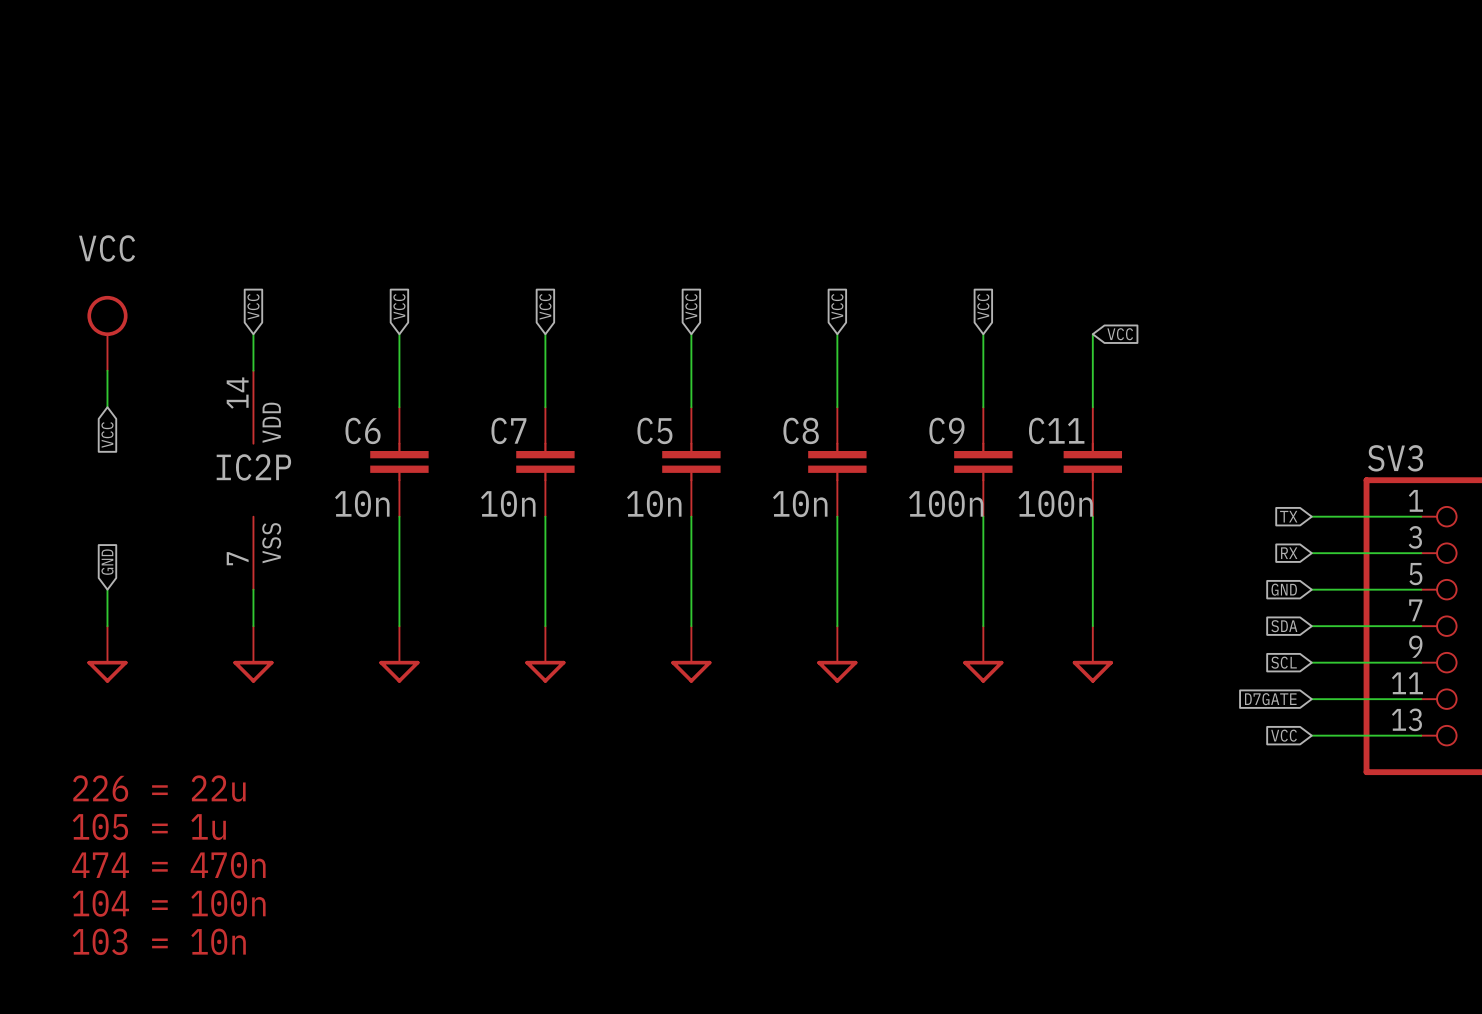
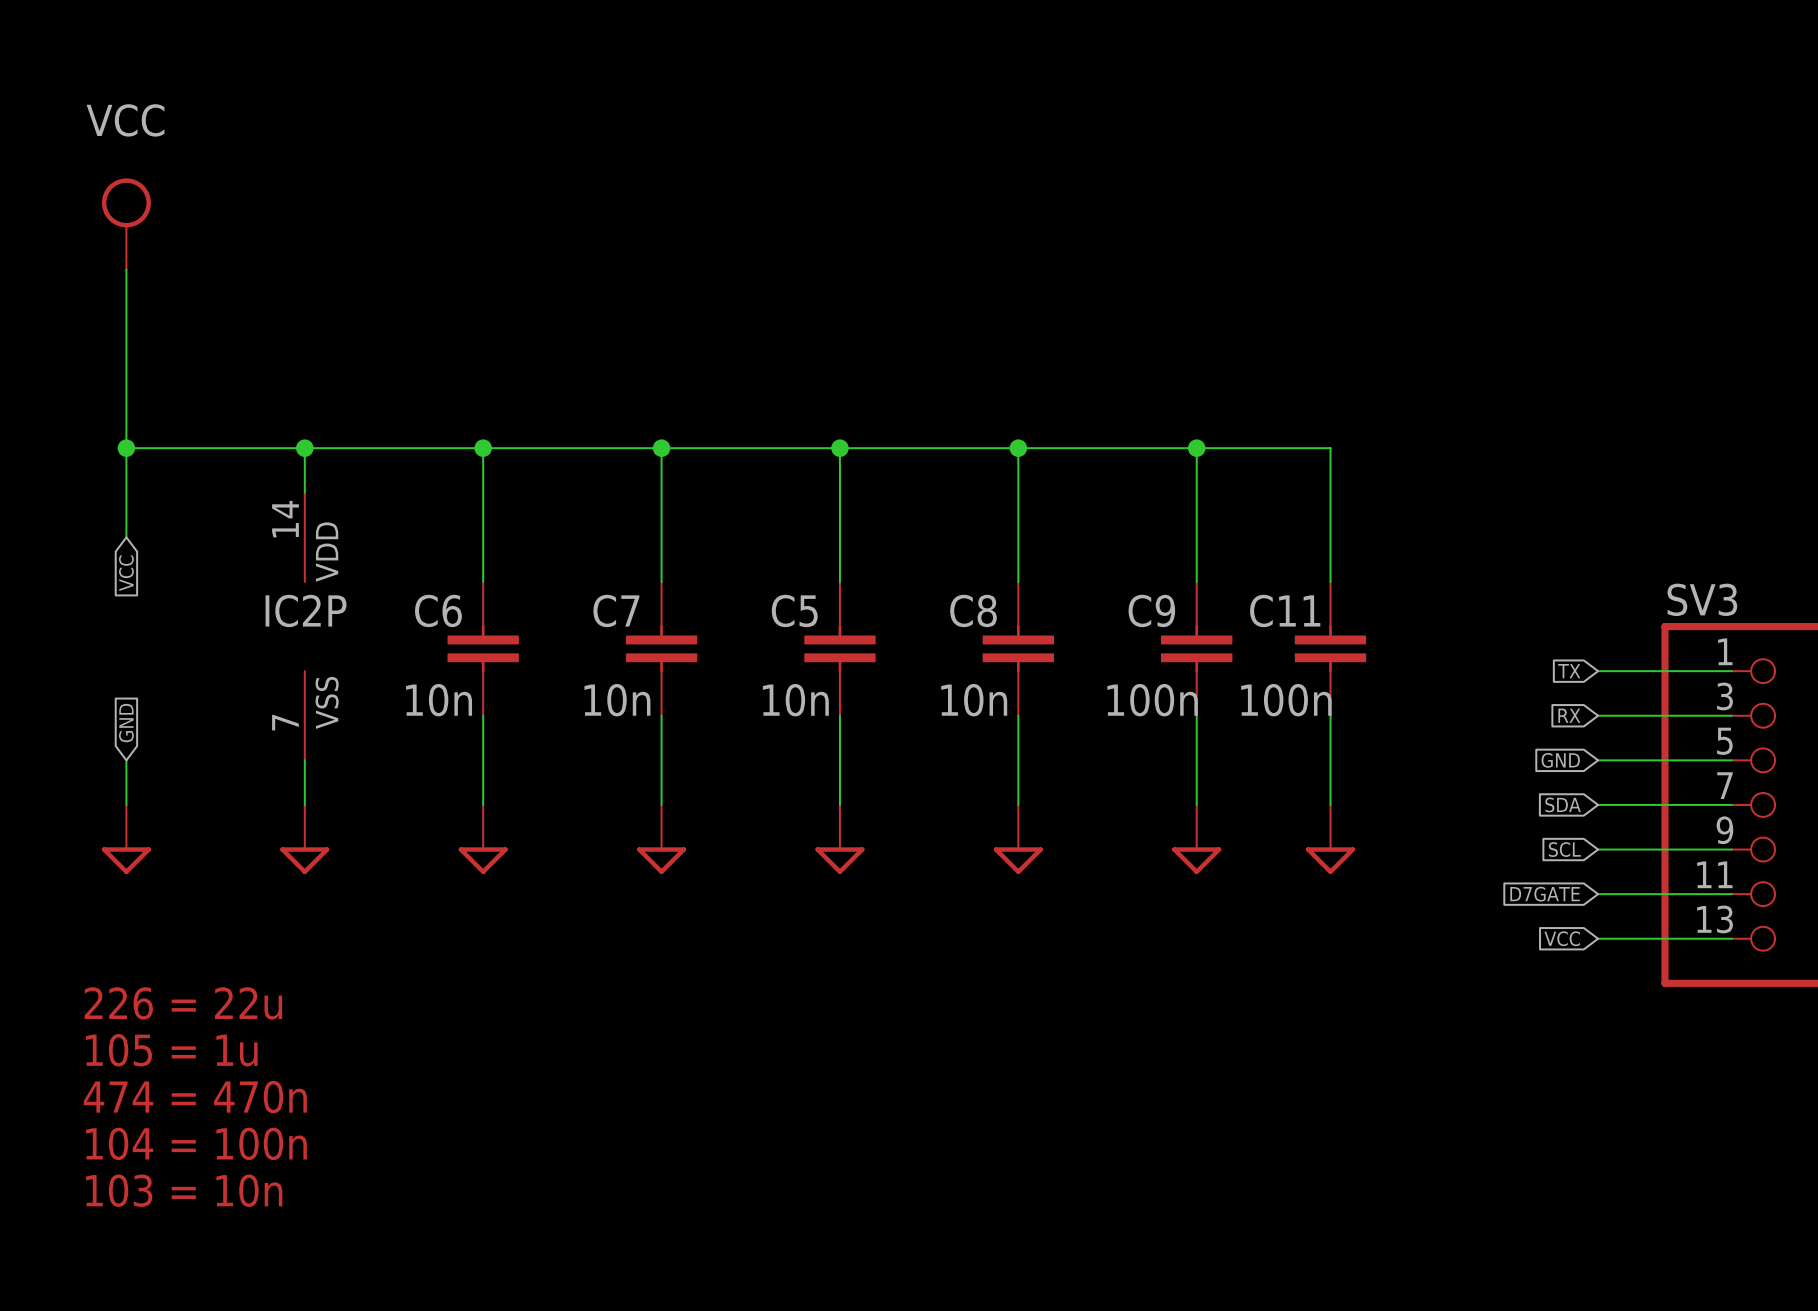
wire: none -> (126, 269) (126, 492)
global label: VCC (253, 306) -> none
global label: VCC (399, 306) -> none
global label: VCC (545, 306) -> none
global label: VCC (691, 306) -> none
global label: VCC (837, 306) -> none
global label: VCC (983, 306) -> none
power symbol position: VCC (107, 333) -> VCC (126, 224)
wire: none -> (126, 448) (1330, 448)
junction: none -> (126, 448)
junction: none -> (304, 448)
junction: none -> (483, 448)
junction: none -> (661, 448)
junction: none -> (839, 448)
junction: none -> (1018, 448)
junction: none -> (1196, 448)
global label: VCC (1120, 334) -> none
C6 position: (399, 461) -> (483, 648)
C7 position: (545, 461) -> (661, 648)
C5 position: (691, 461) -> (839, 648)
C8 position: (837, 461) -> (1018, 648)
C9 position: (983, 461) -> (1196, 648)
C11 position: (1092, 461) -> (1330, 648)

